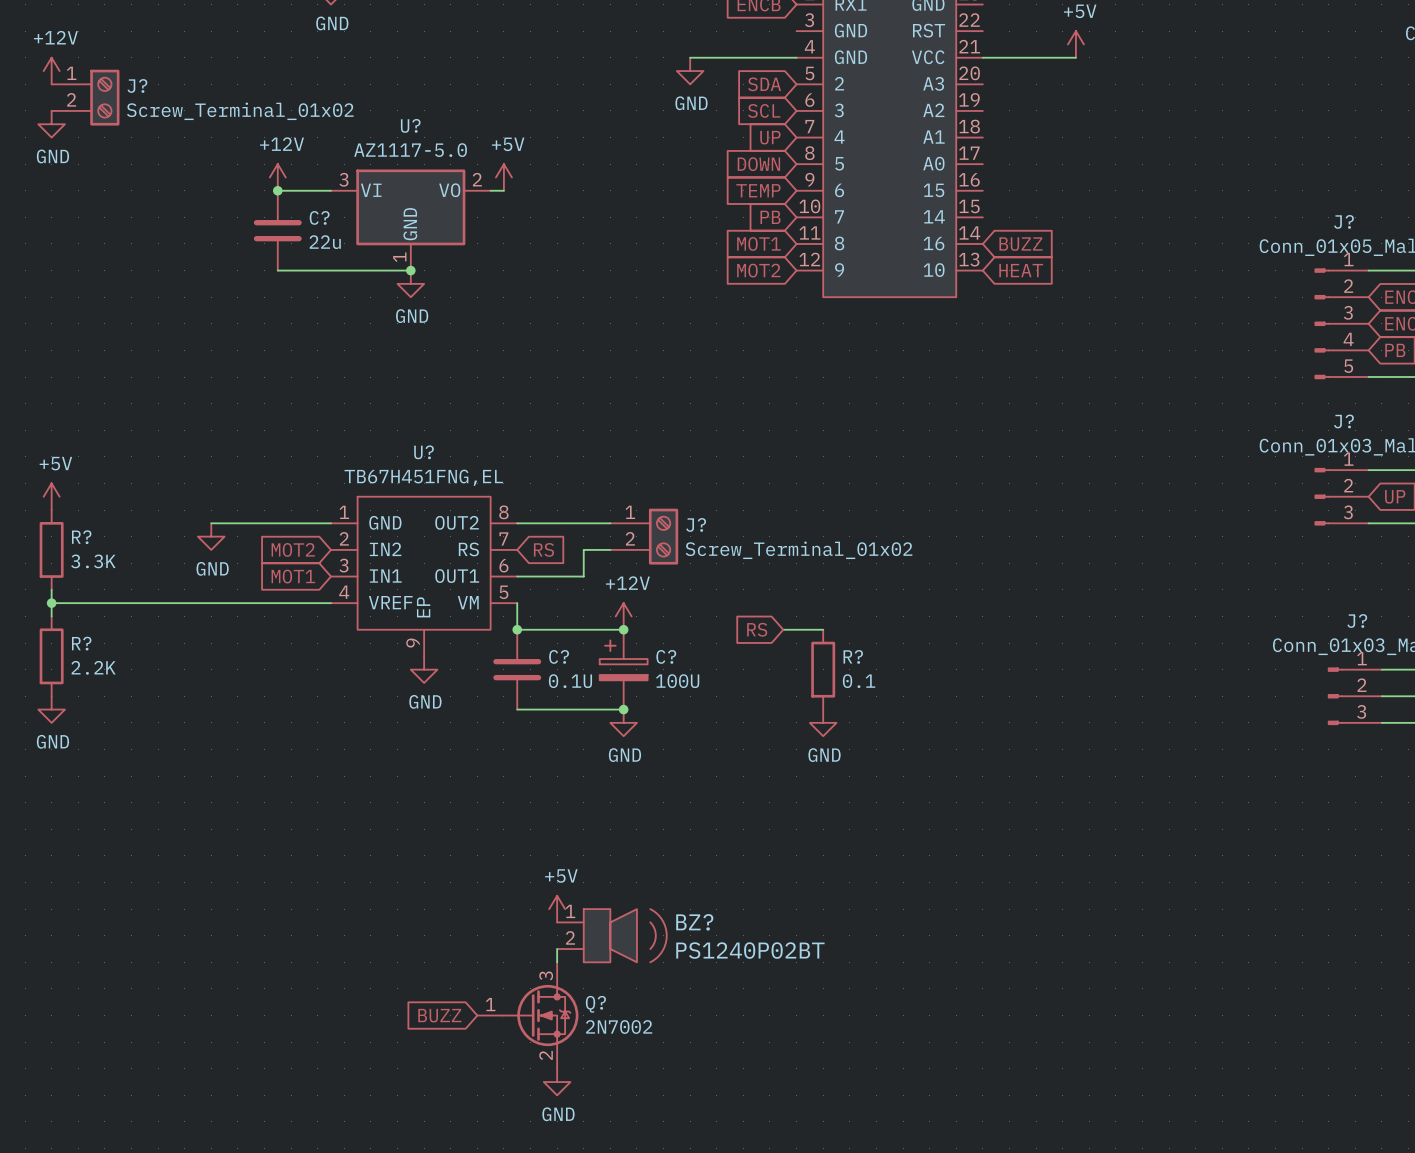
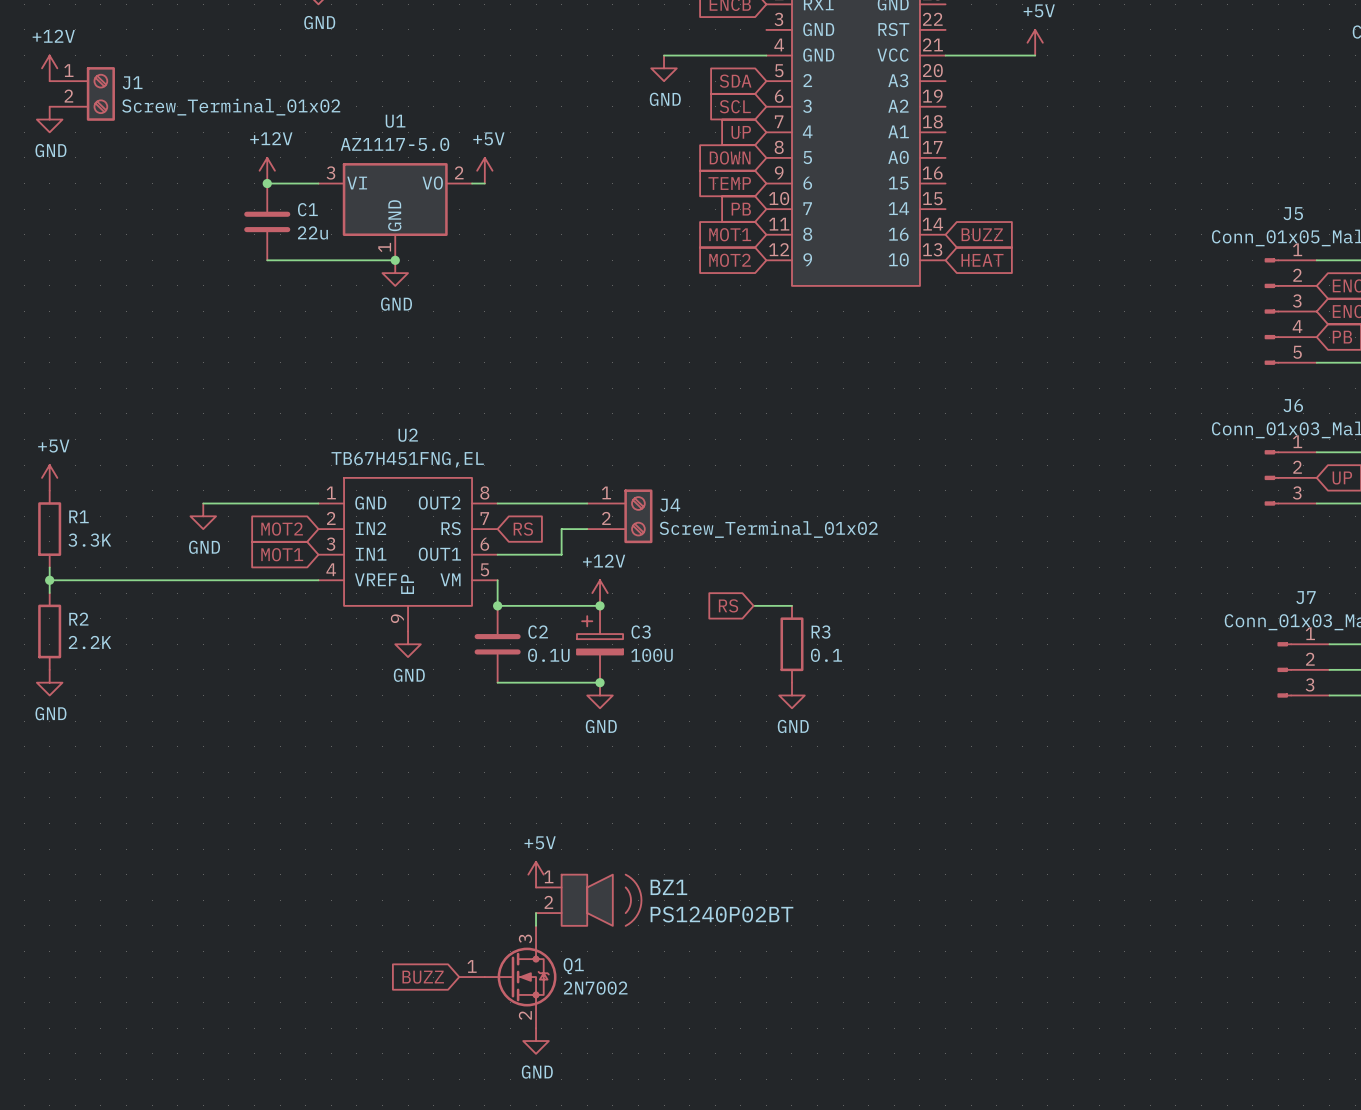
J? name: J? (137, 85) -> J1 (132, 82)
U? name: U? (410, 125) -> U1 (395, 121)
C? name: C? (319, 217) -> C1 (307, 209)
J? name: J? (1343, 221) -> J5 (1293, 213)
J? name: J? (1343, 421) -> J6 (1293, 405)
U? name: U? (424, 452) -> U2 (408, 435)
J? name: J? (696, 524) -> J4 (670, 505)
R? name: R? (81, 537) -> R1 (78, 516)
J? name: J? (1357, 621) -> J7 (1306, 597)
R? name: R? (81, 643) -> R2 (78, 619)
C? name: C? (559, 656) -> C2 (538, 632)
C? name: C? (666, 656) -> C3 (641, 632)
R? name: R? (853, 656) -> R3 (820, 632)
BZ? name: BZ? (694, 922) -> BZ1 (668, 887)
Q? name: Q? (595, 1004) -> Q1 (573, 966)

